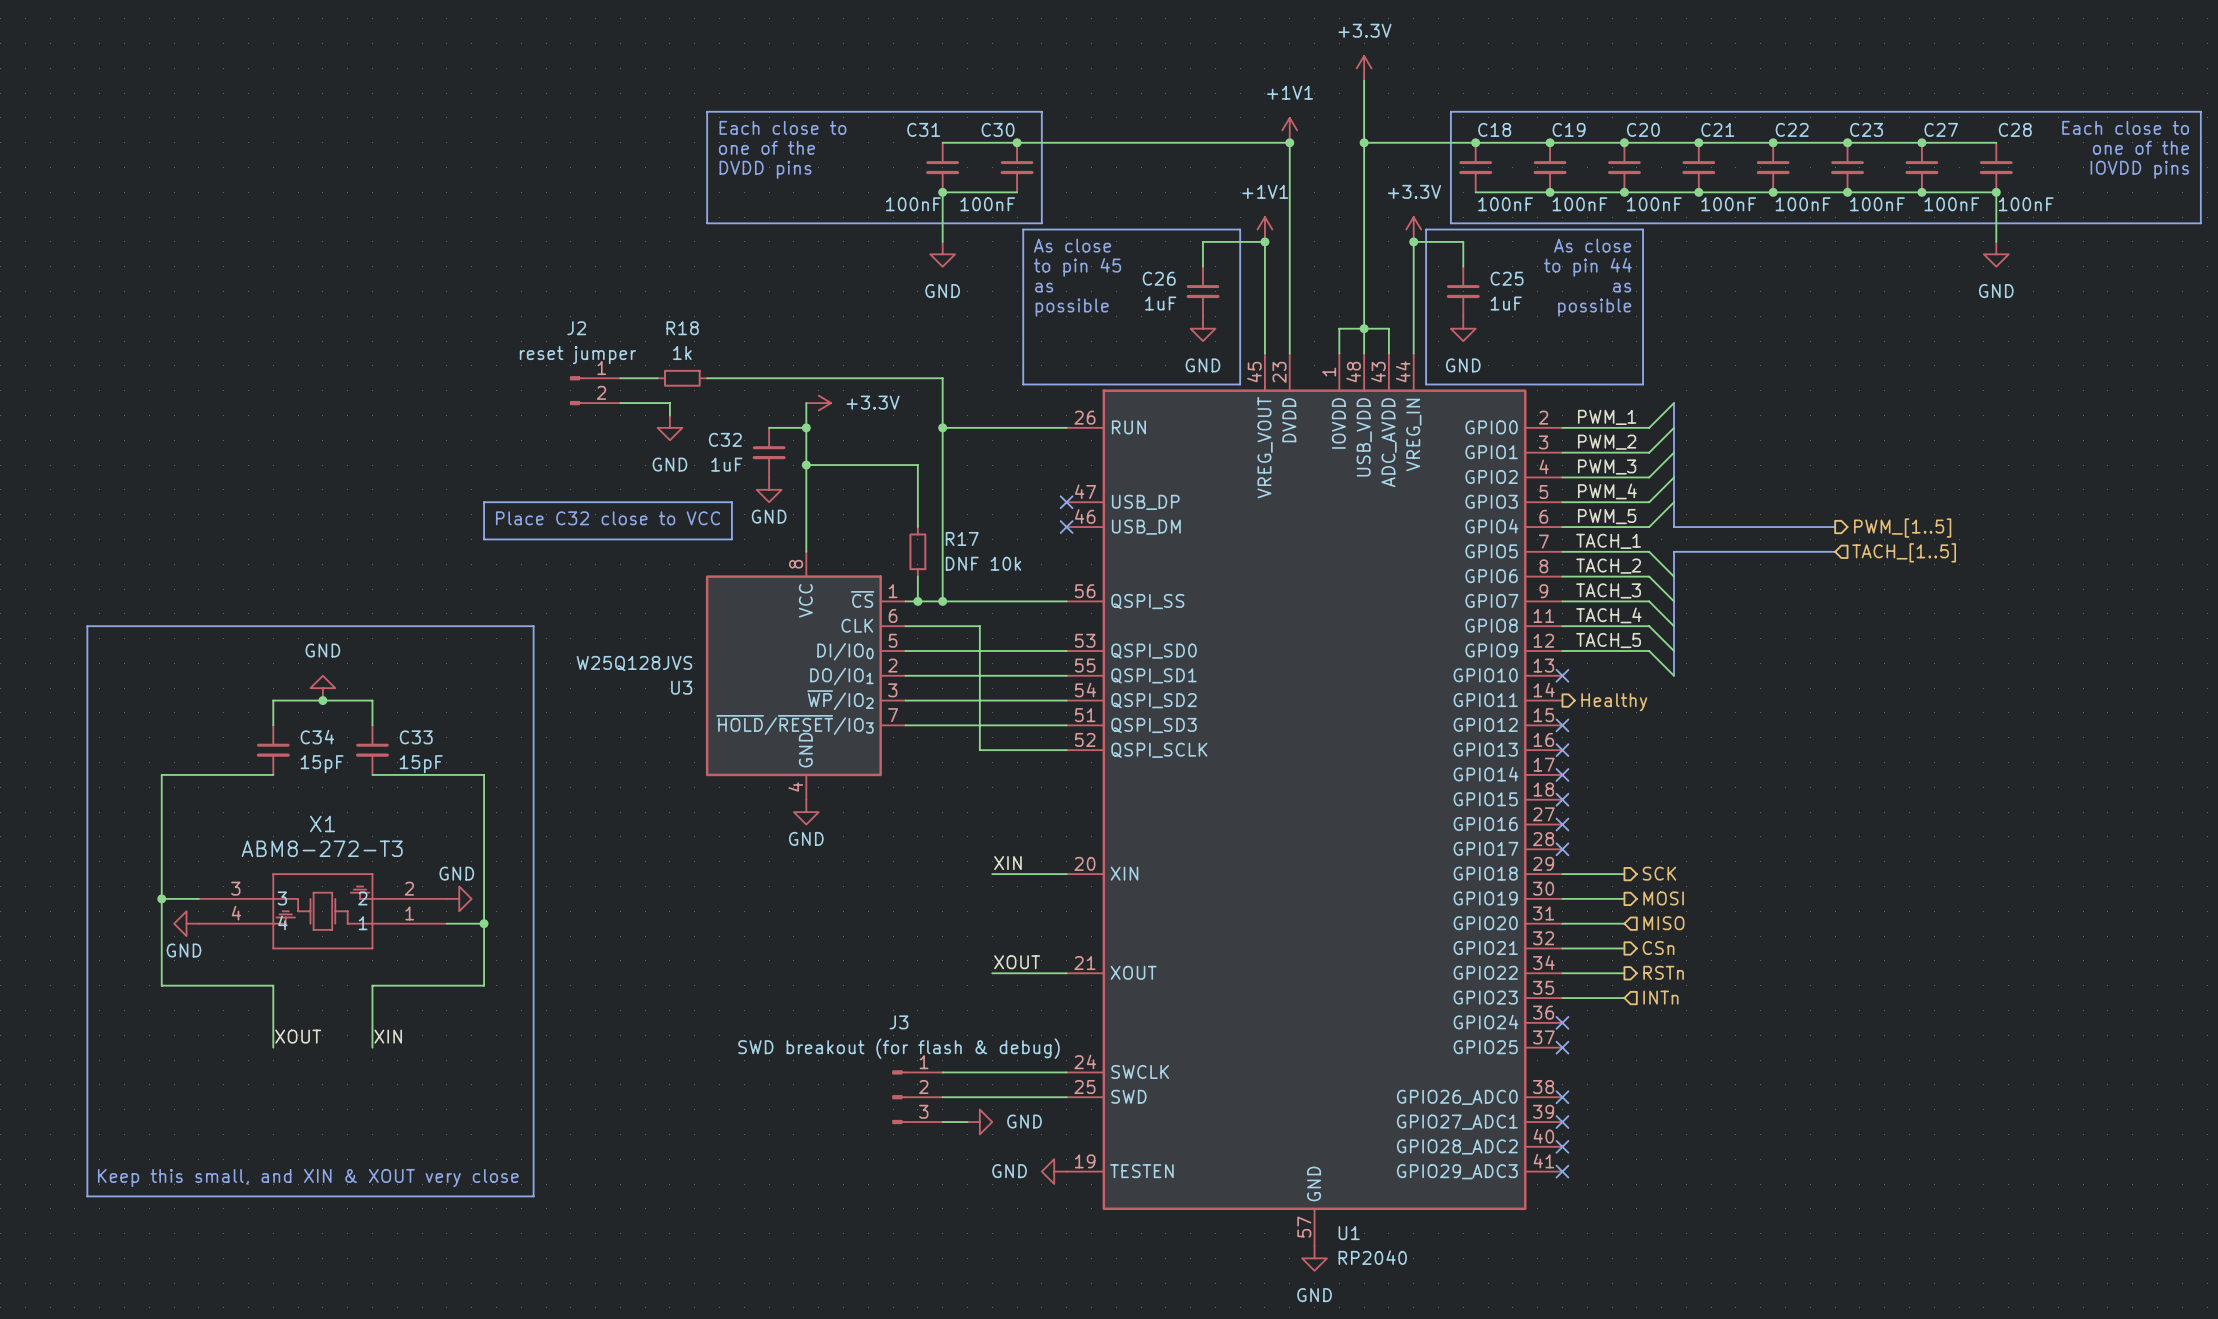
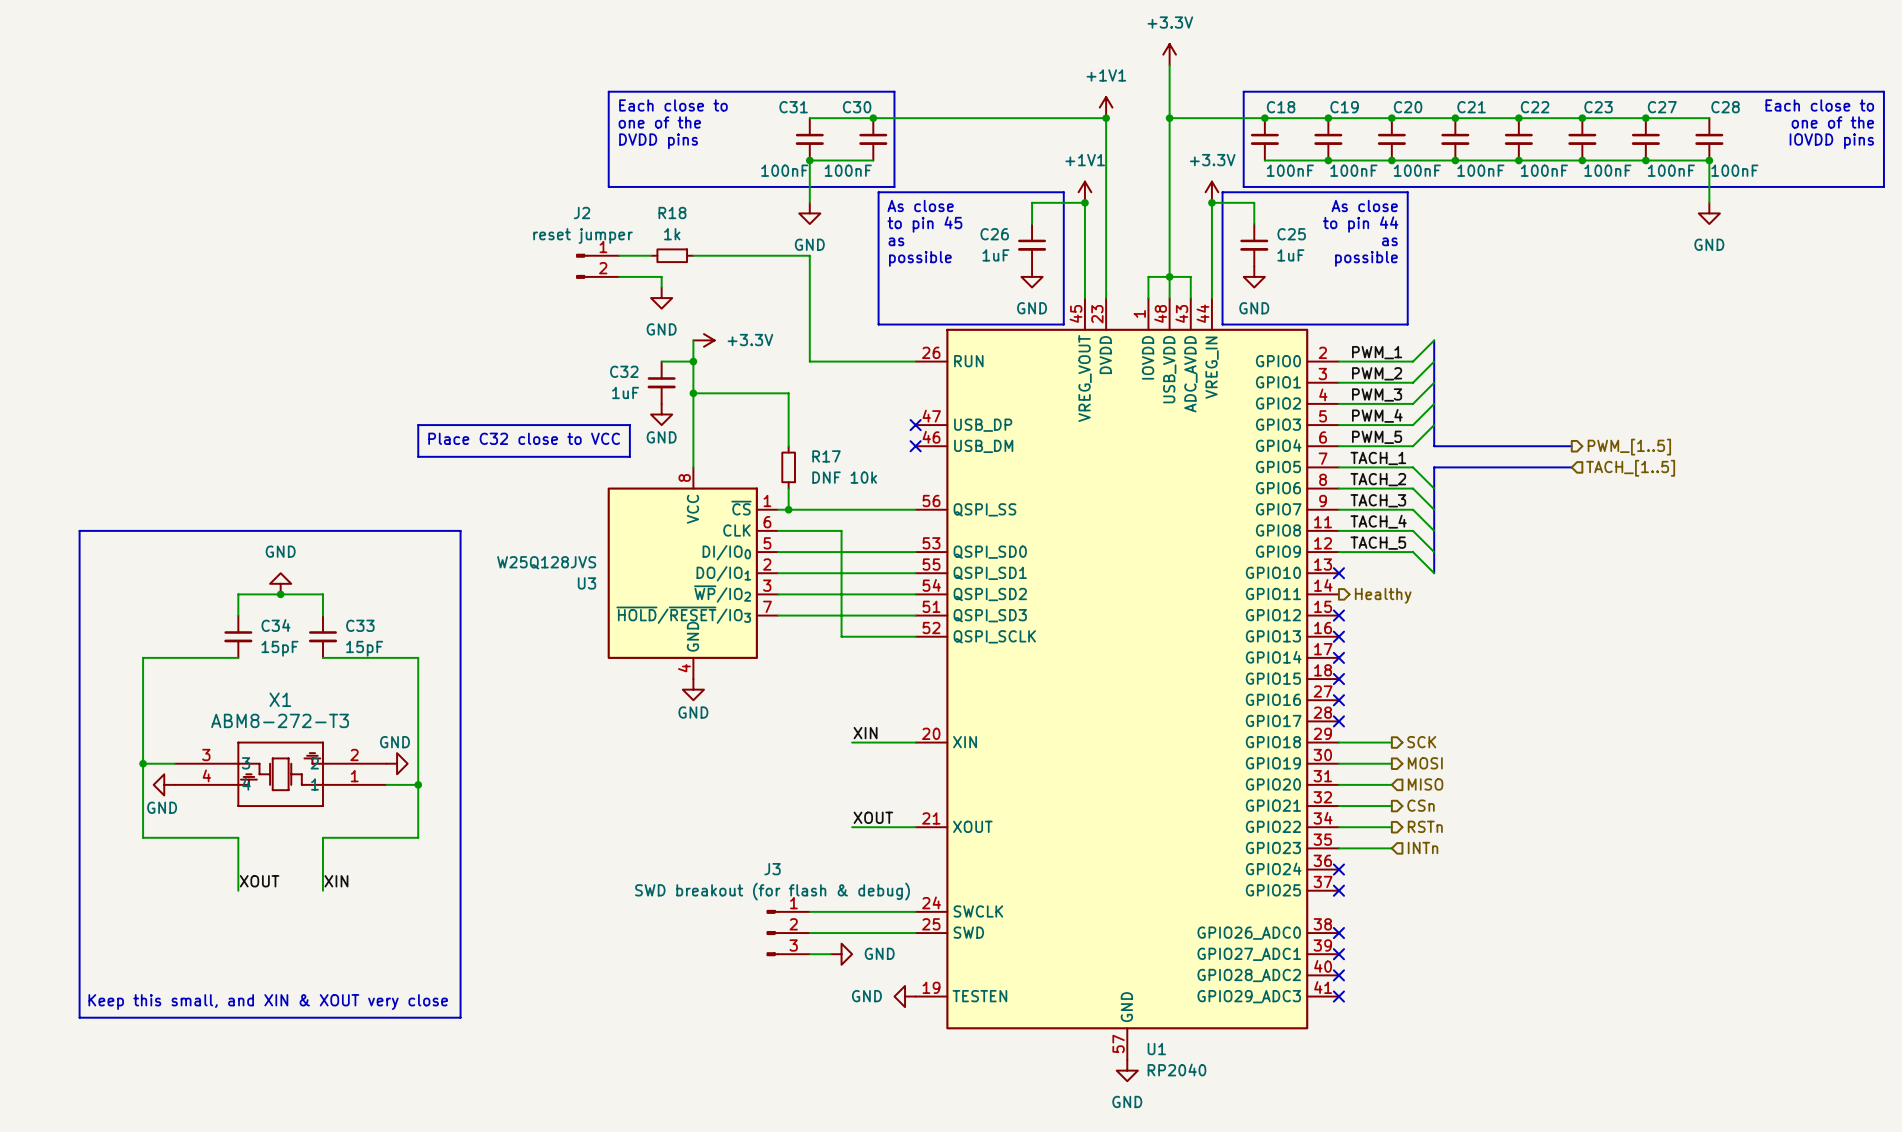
wire: (620, 378) (657, 378) -> (619, 255) (651, 255)
R18 position: (682, 378) -> (672, 255)
wire: (707, 378) (942, 378) -> (693, 255) (809, 255) (809, 319)
J2 position: (595, 390) -> (597, 266)
wire: (620, 403) (669, 403) (669, 415) -> (619, 276) (661, 276) (661, 287)
power symbol position: GND (669, 427) -> GND (661, 298)
wire: (942, 427) (942, 601) -> none
junction: (942, 427) -> none
junction: (942, 601) -> none

